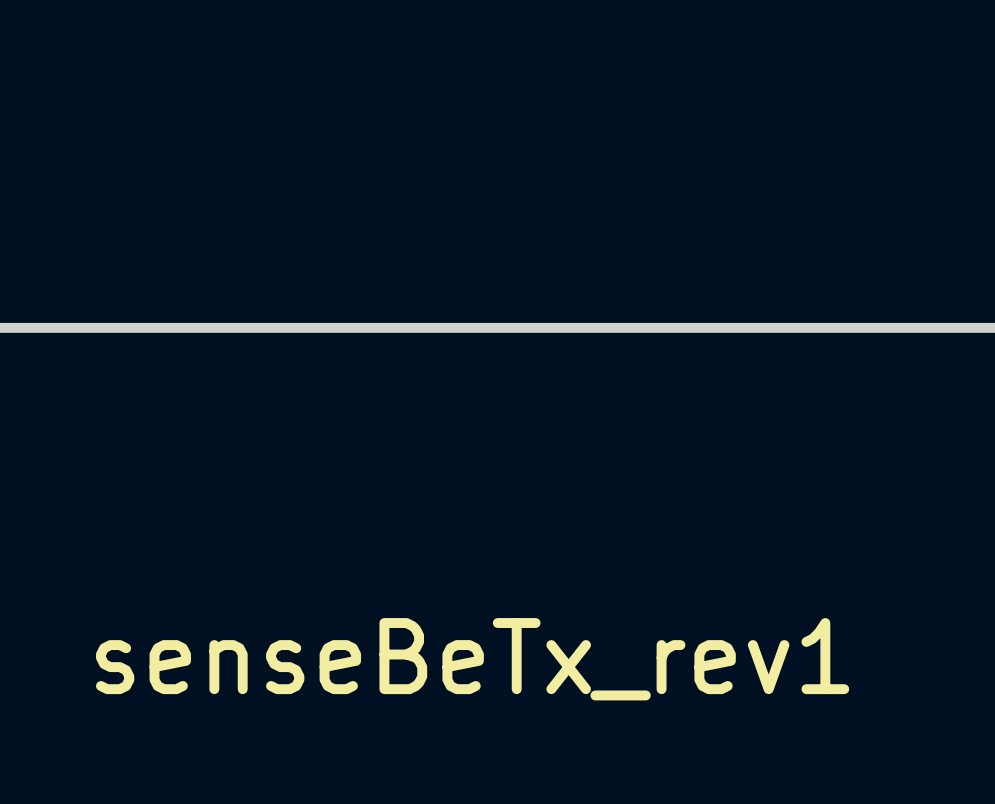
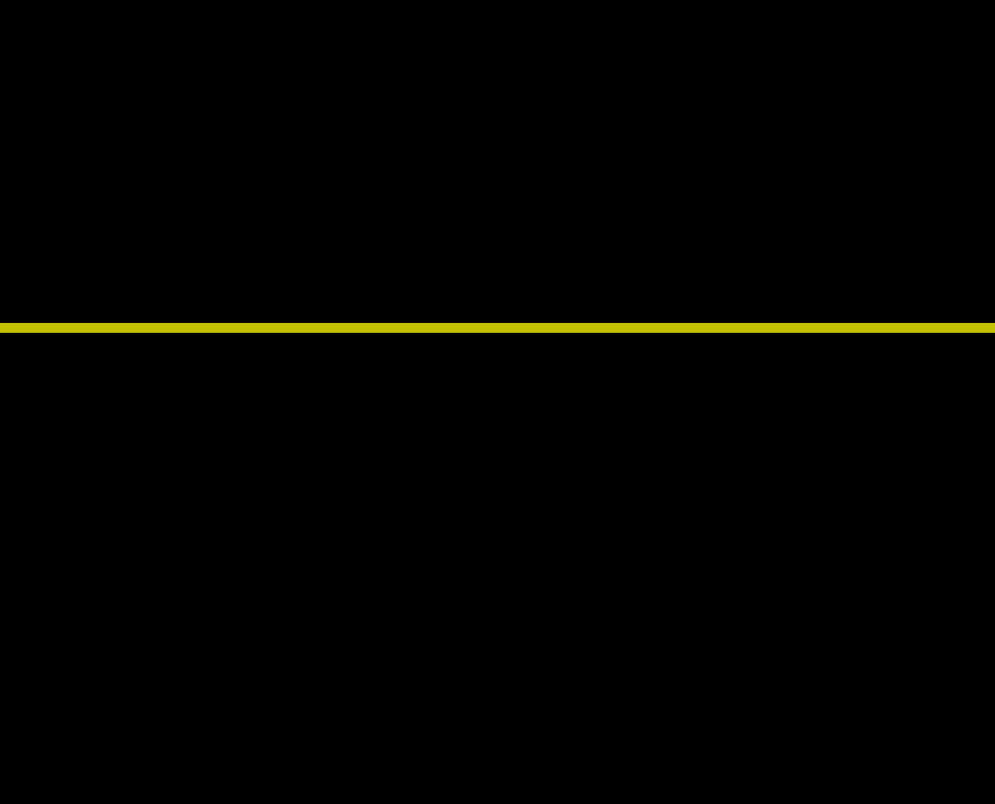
text: senseBeTx_rev1 (472, 659) -> none

